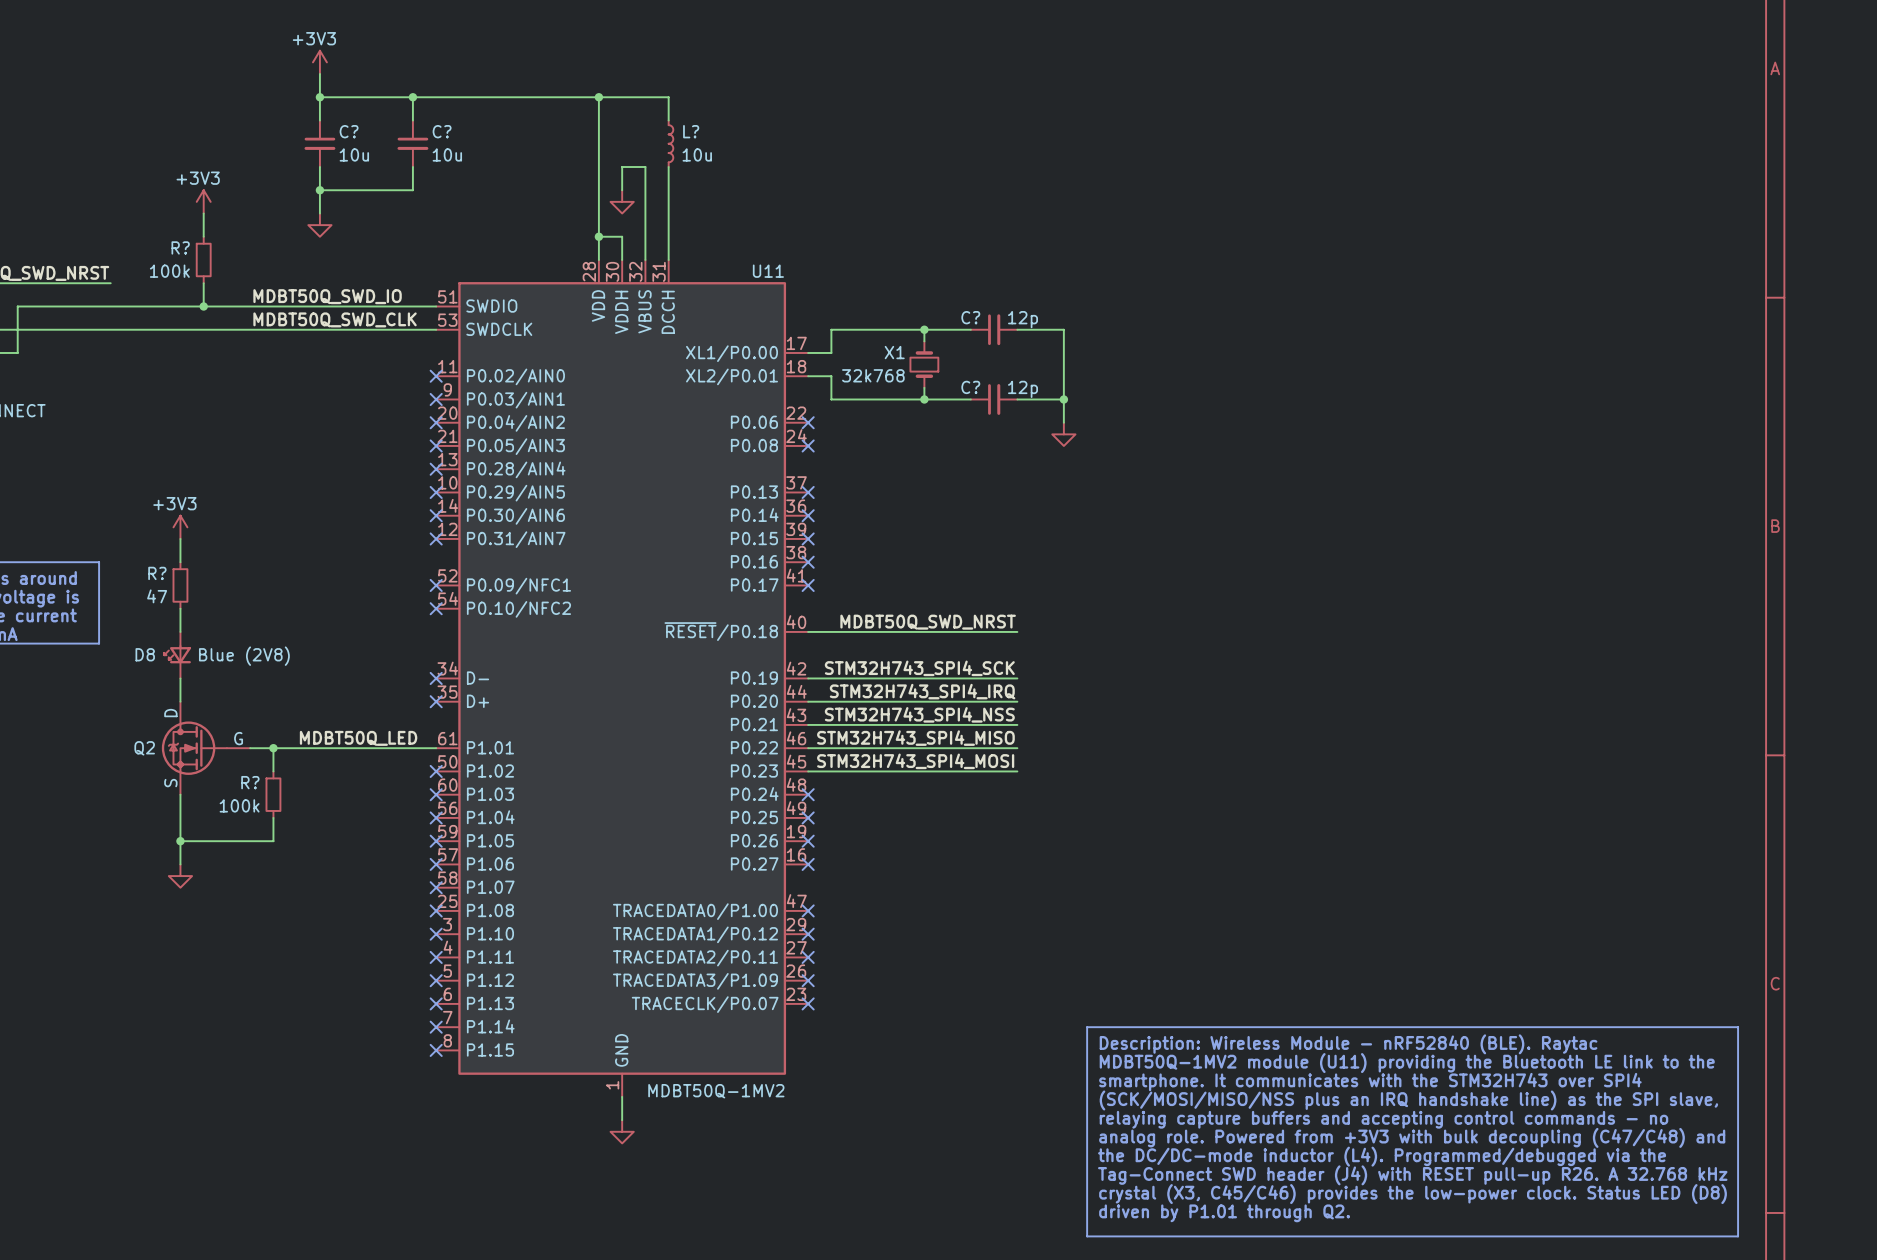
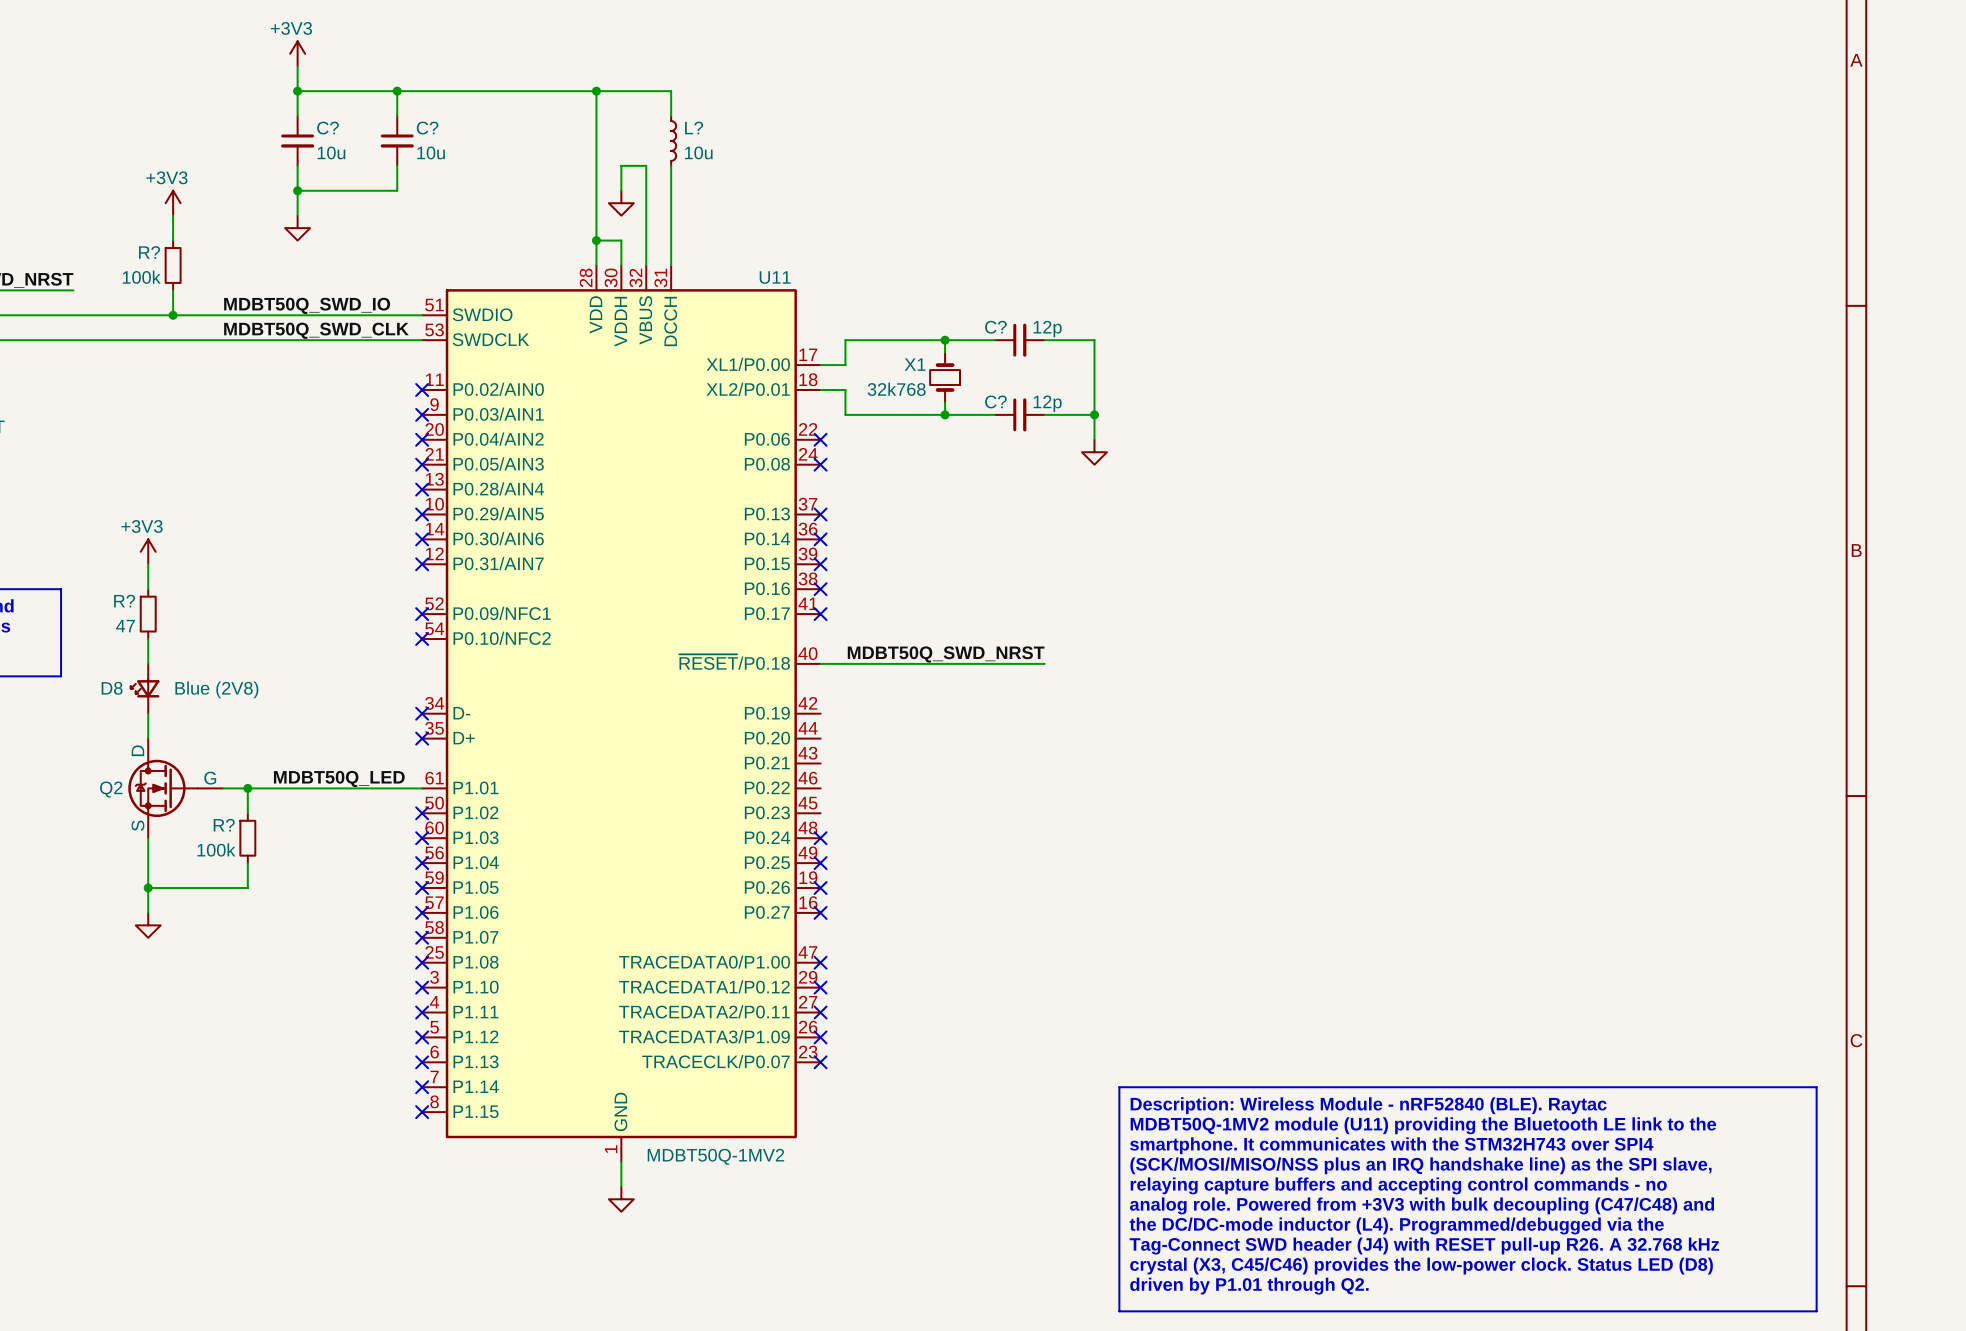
label: STM32H743_SPI4_SCK (919, 668) -> none
wire: (808, 678) (1017, 678) -> none
label: STM32H743_SPI4_IRQ (922, 691) -> none
wire: (808, 701) (1017, 701) -> none
label: STM32H743_SPI4_NSS (919, 714) -> none
wire: (808, 724) (1017, 724) -> none
label: STM32H743_SPI4_MISO (915, 738) -> none
wire: (808, 748) (1017, 748) -> none
label: STM32H743_SPI4_MOSI (915, 761) -> none
wire: (808, 771) (1017, 771) -> none

